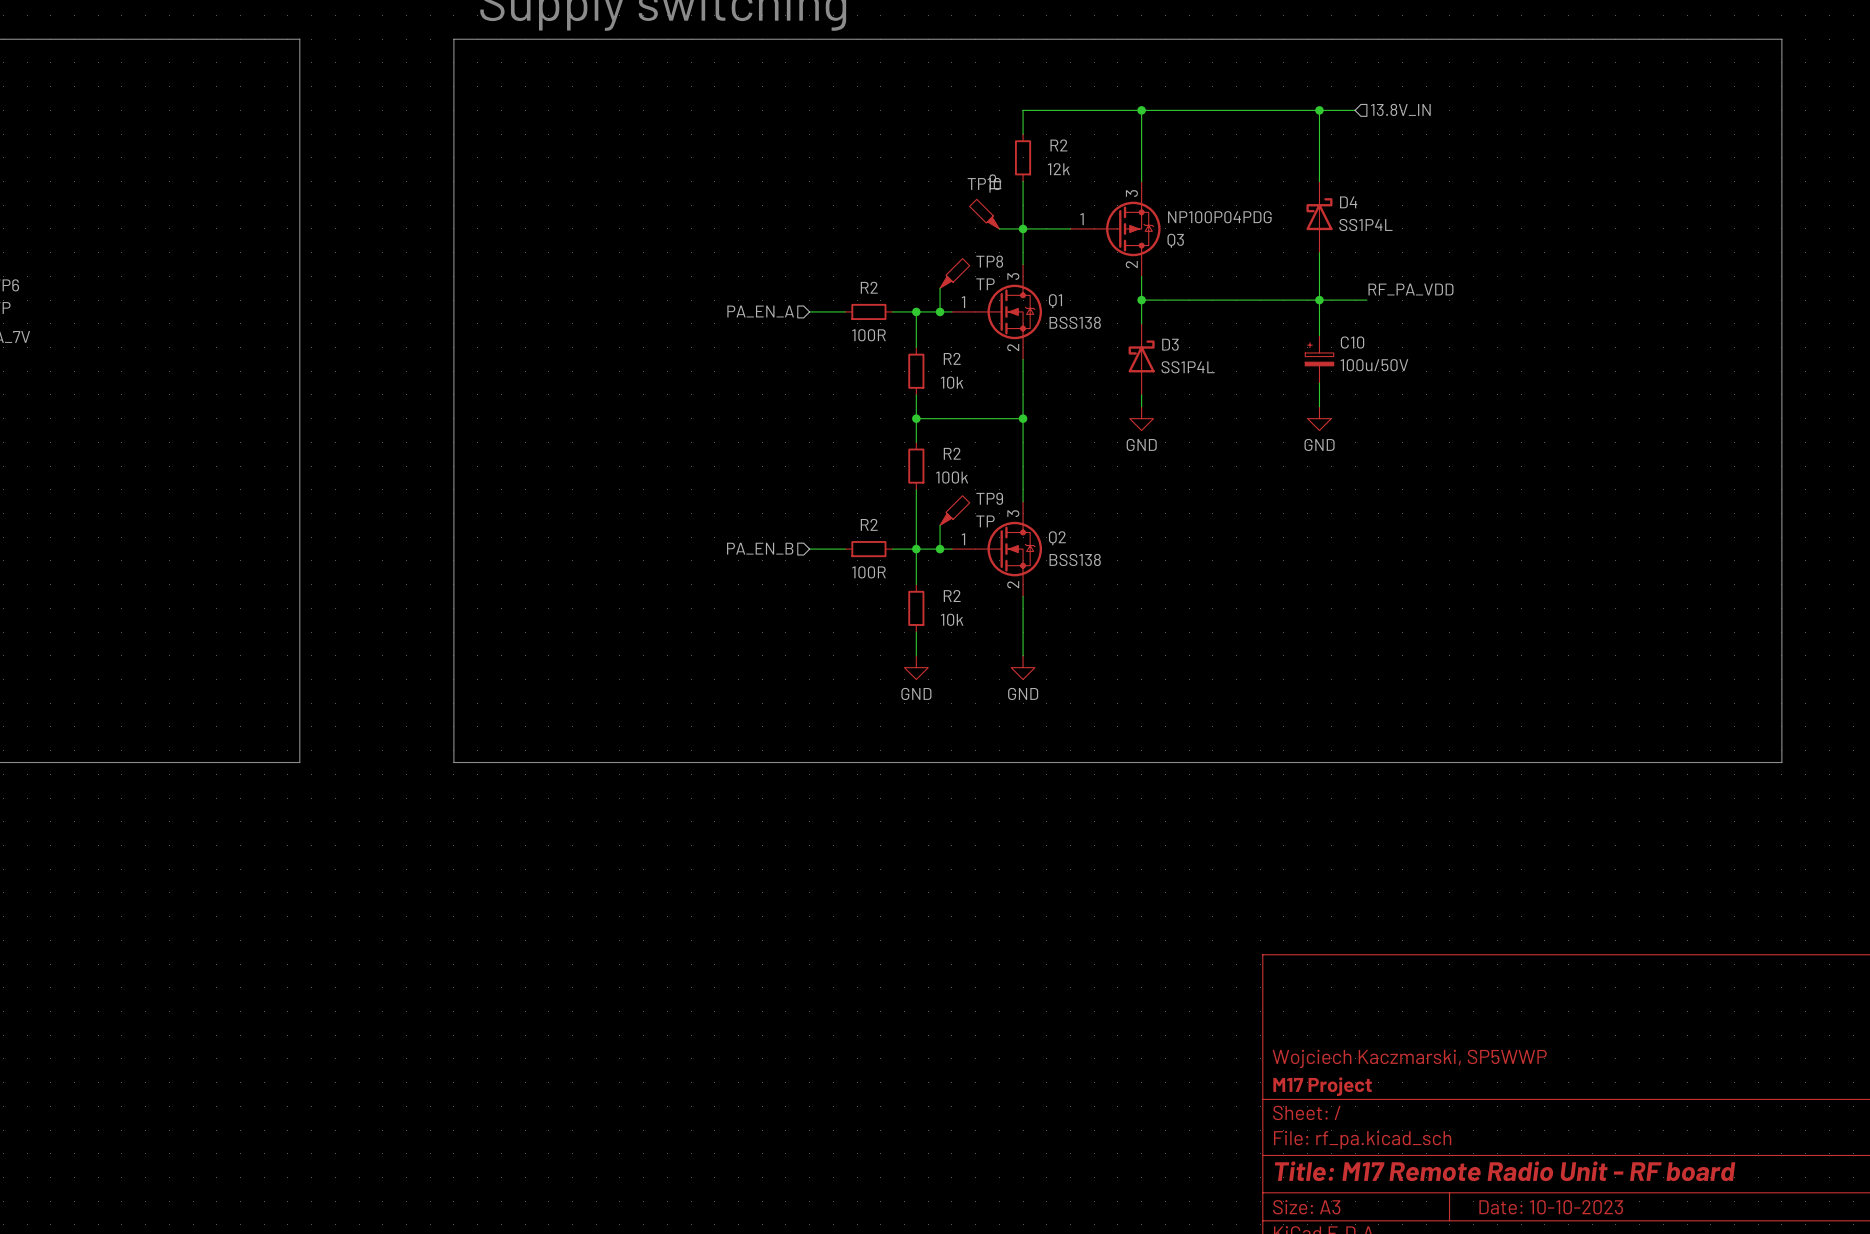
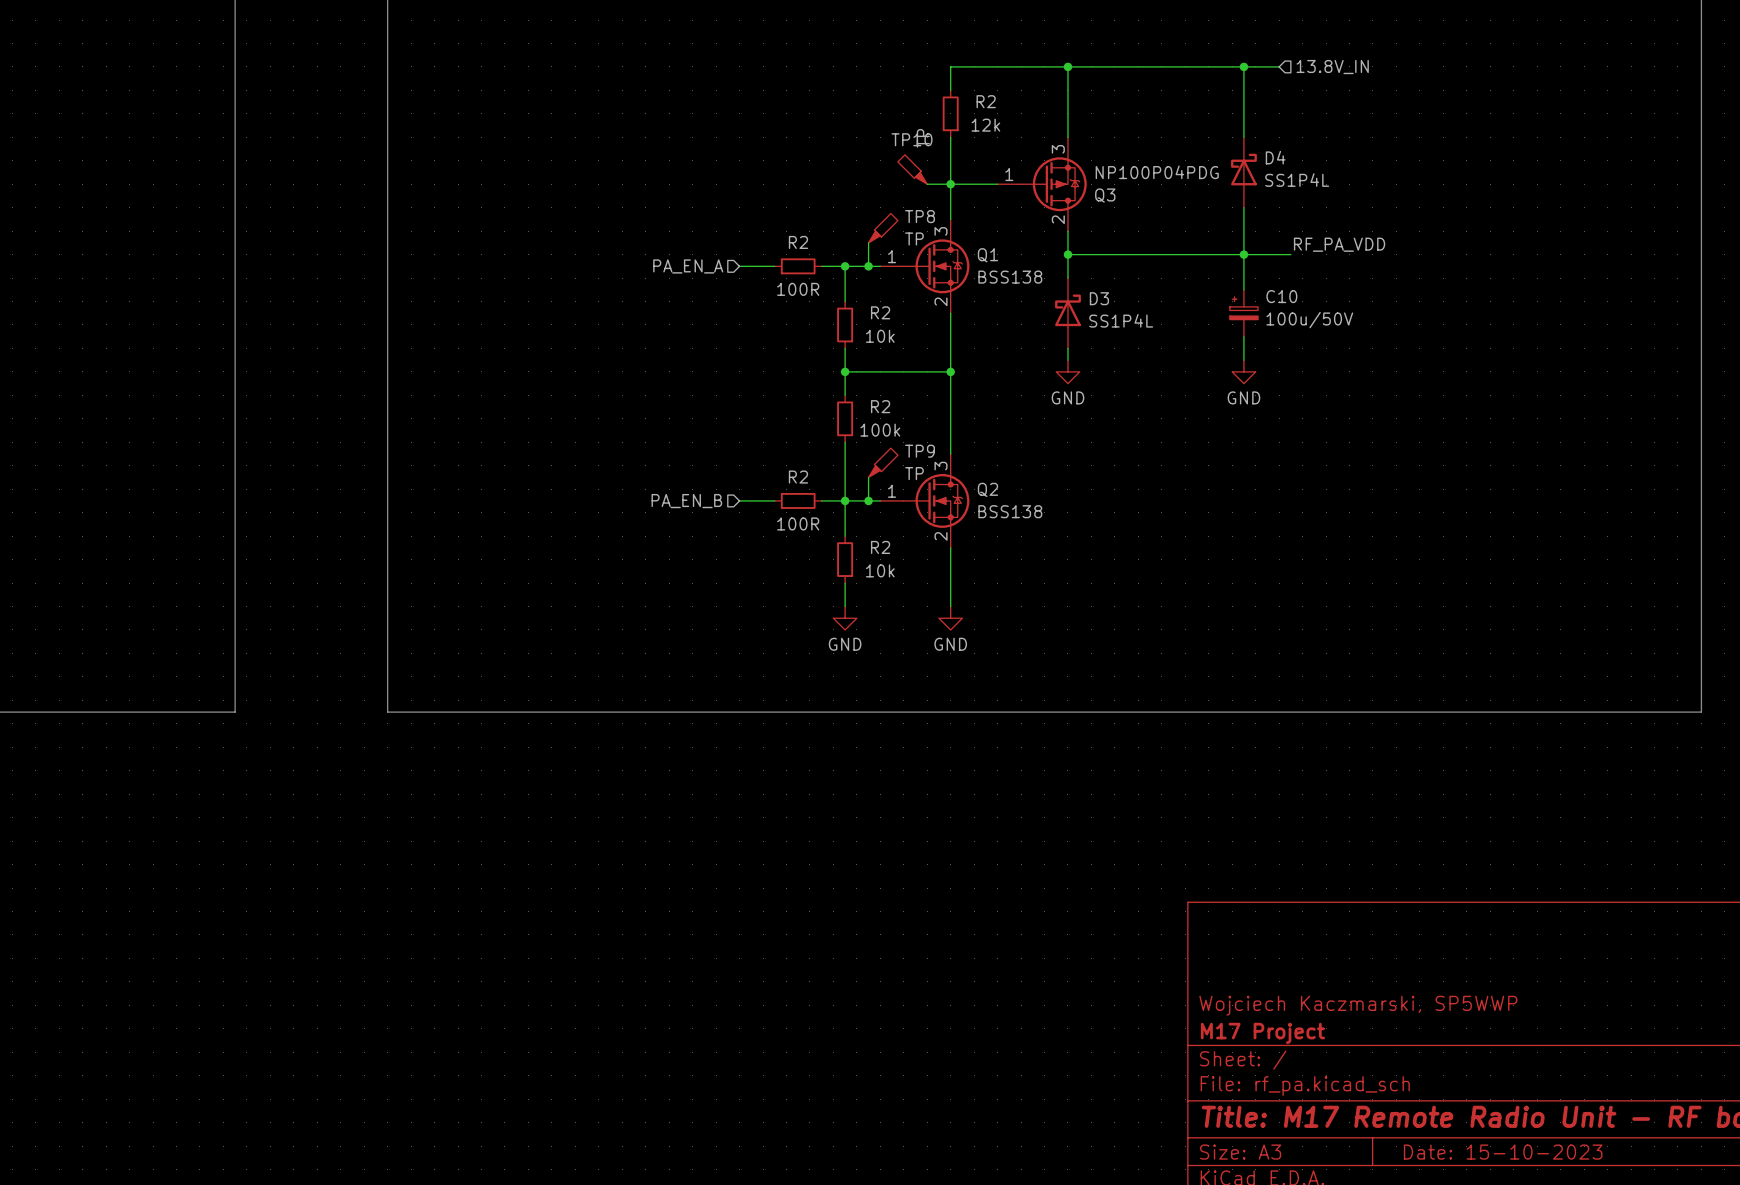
title block: Date: 10-10-2023 (1551, 1207) -> Date: 15-10-2023 (1503, 1152)

